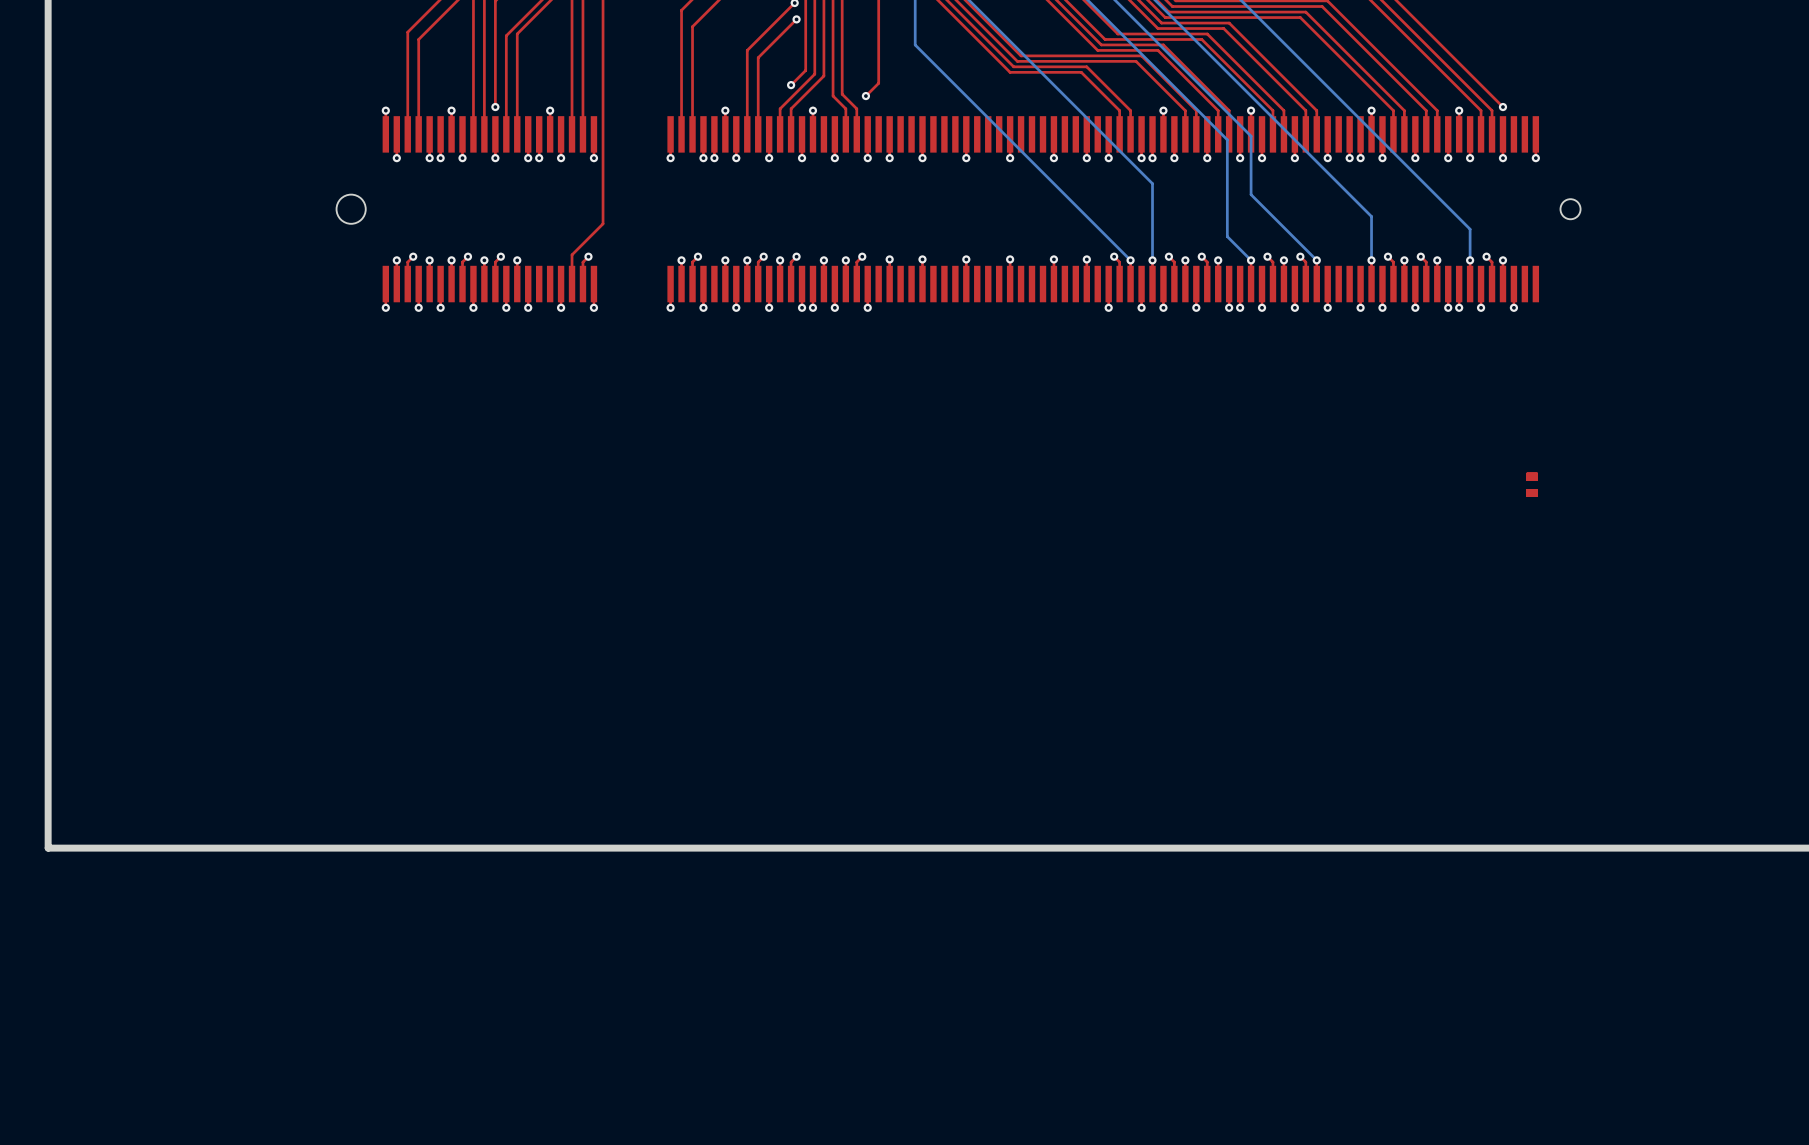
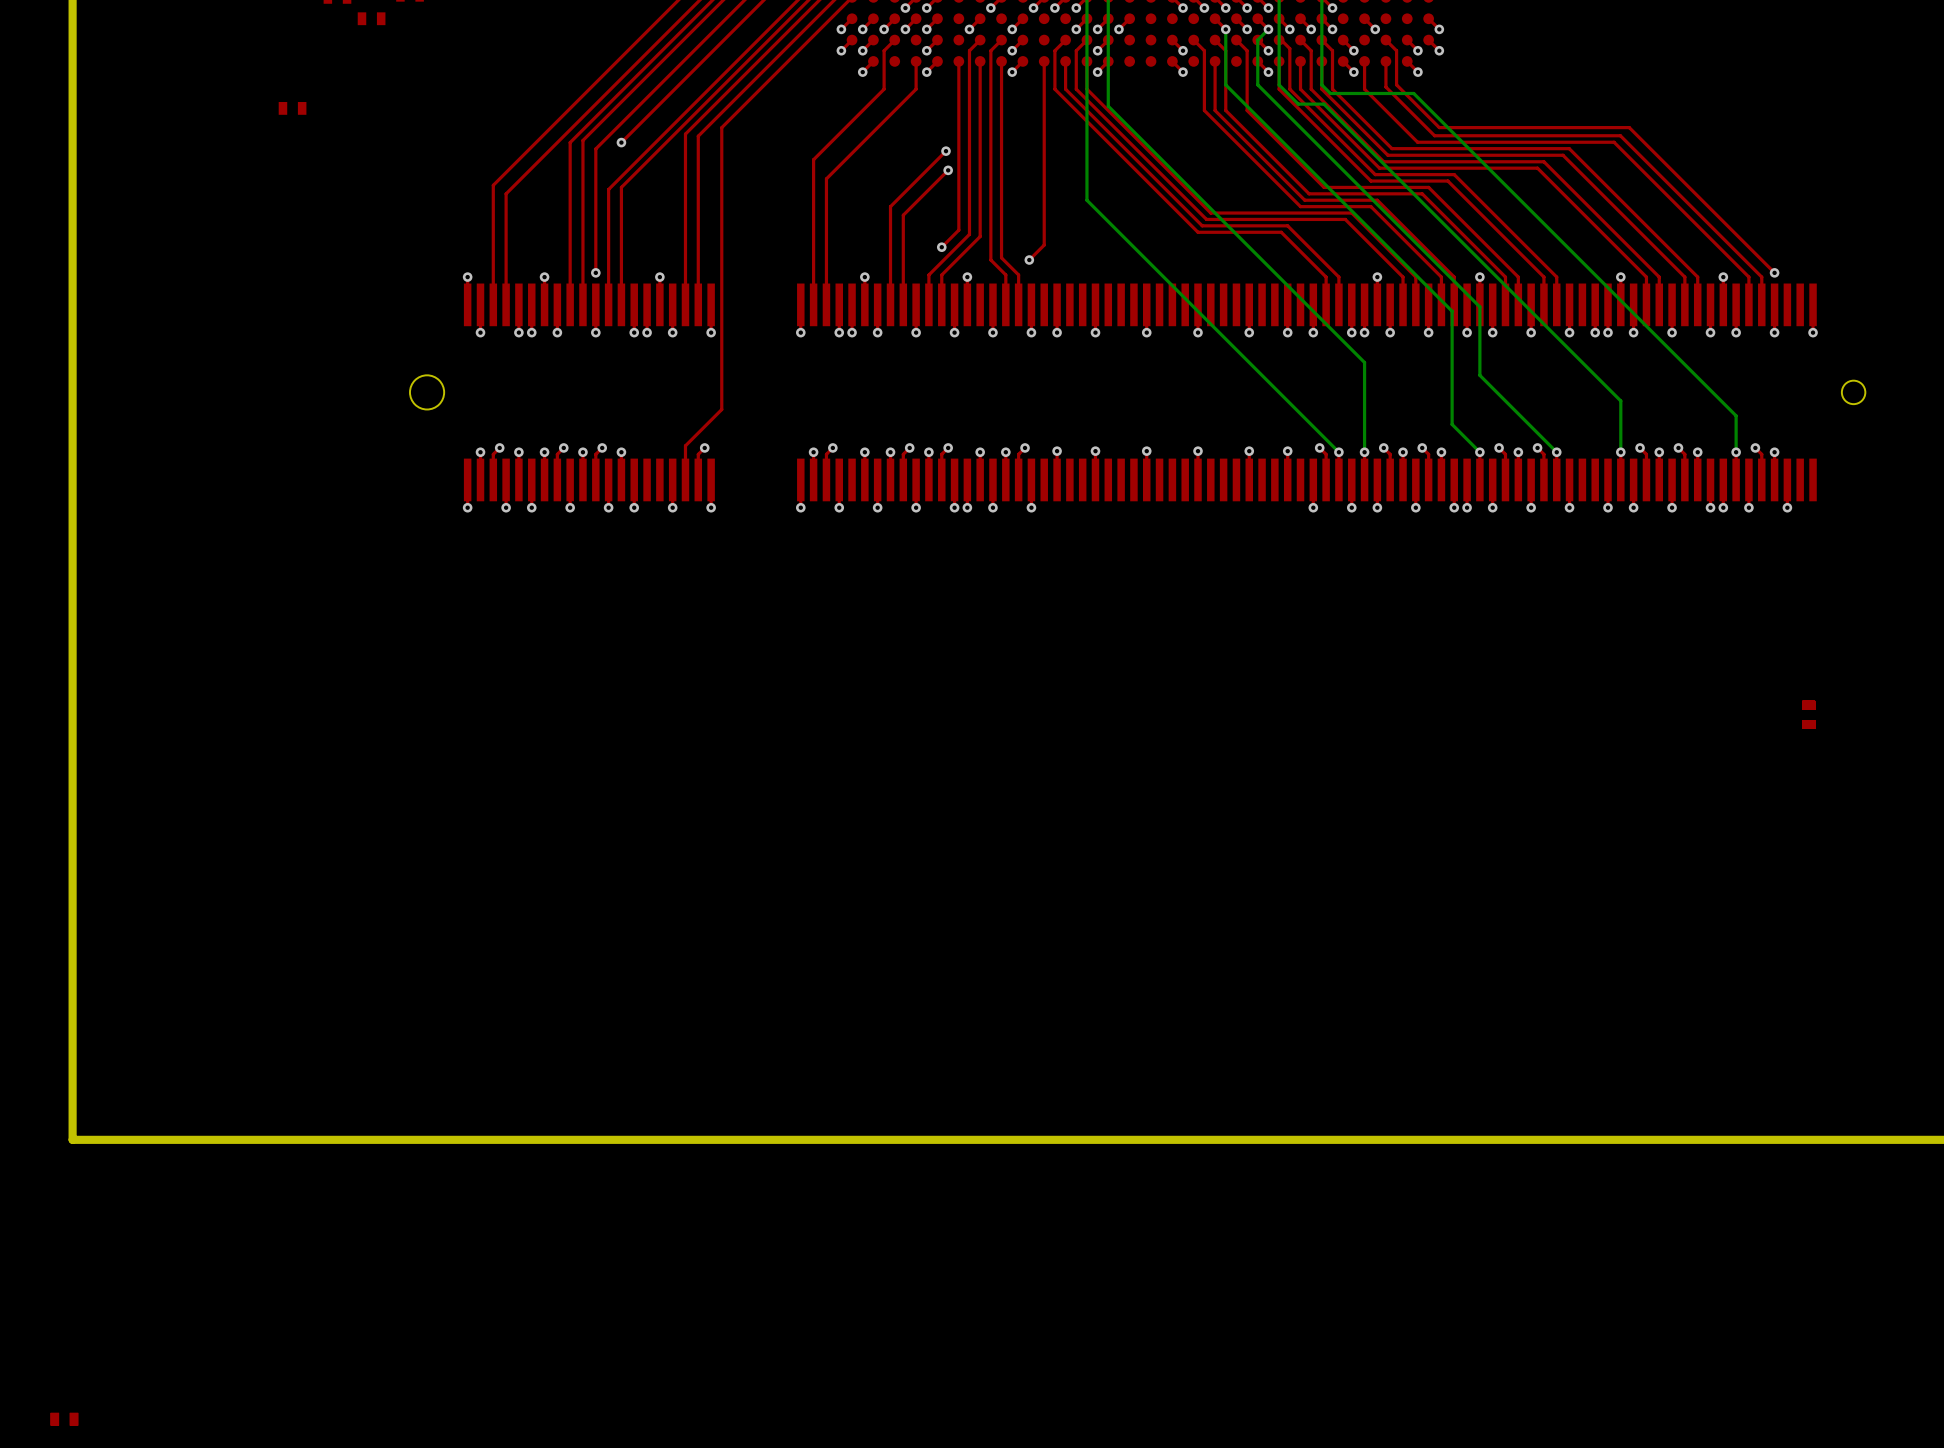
part: none -> (64, 1419)

